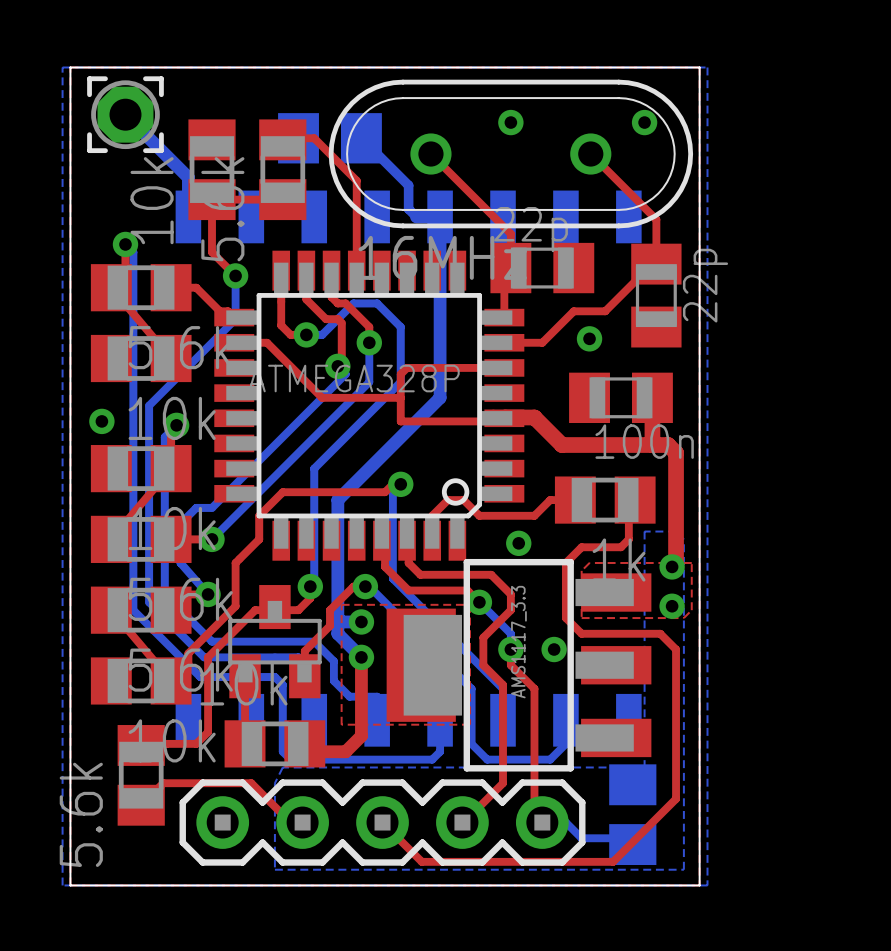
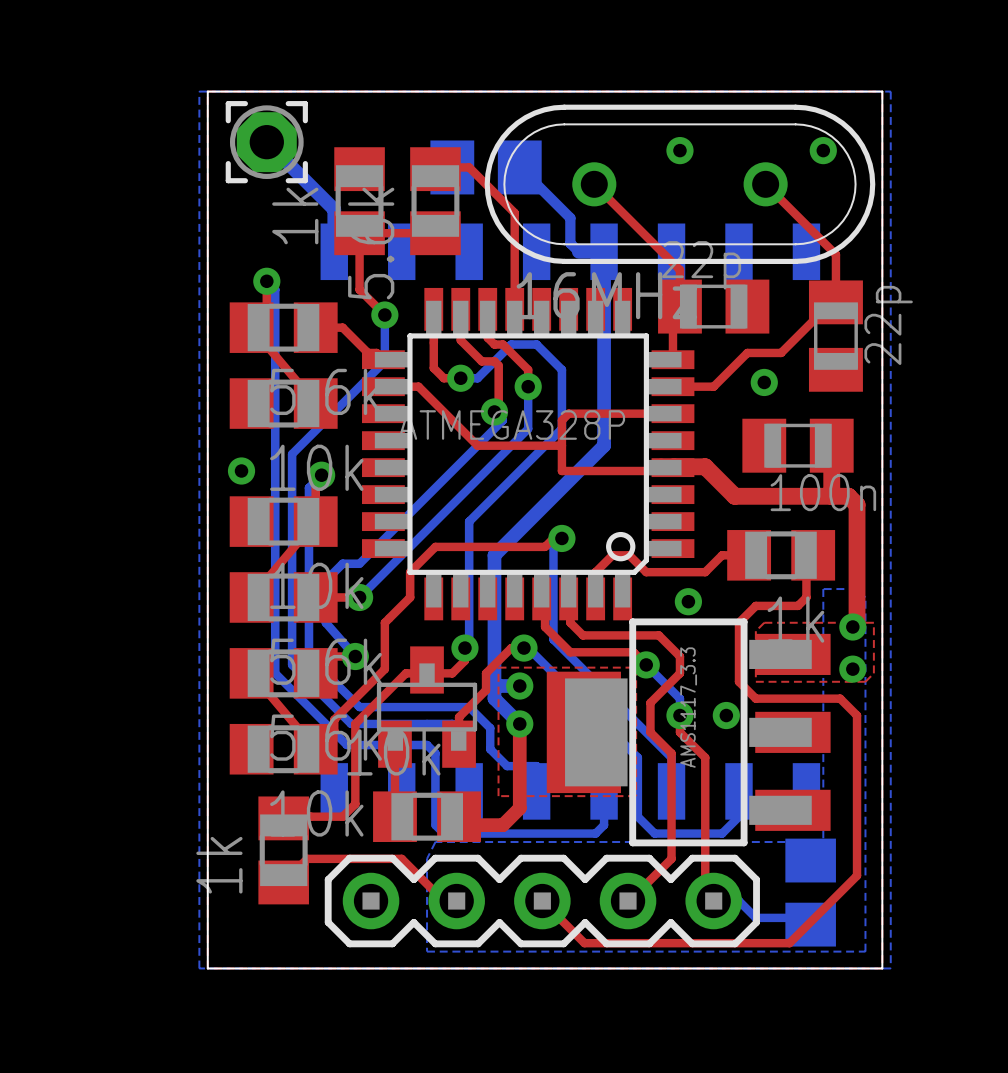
part value: 10k (152, 200) -> 1k (295, 215)
part value: 5.6k (81, 814) -> 1k (219, 865)

